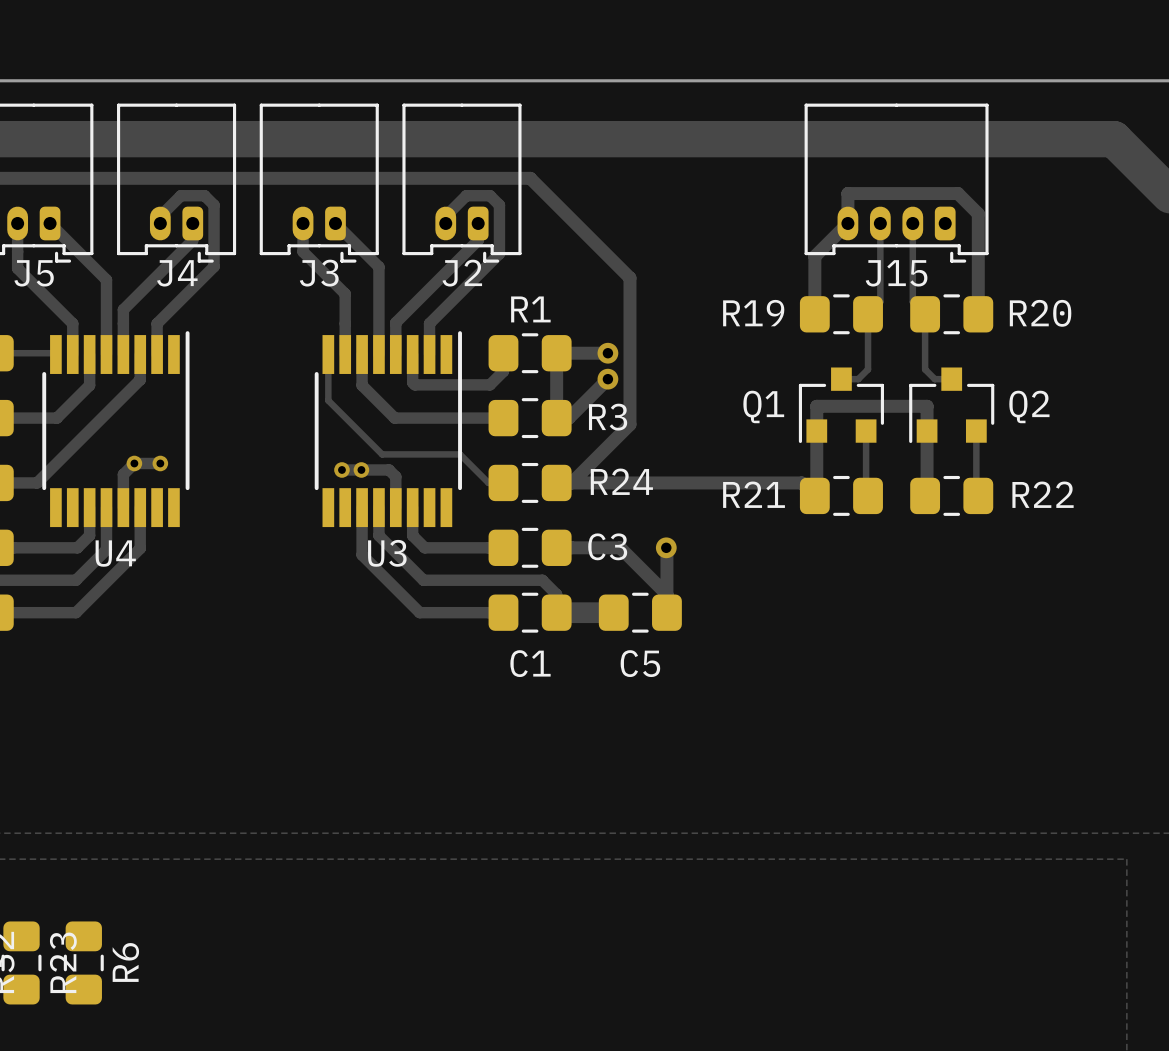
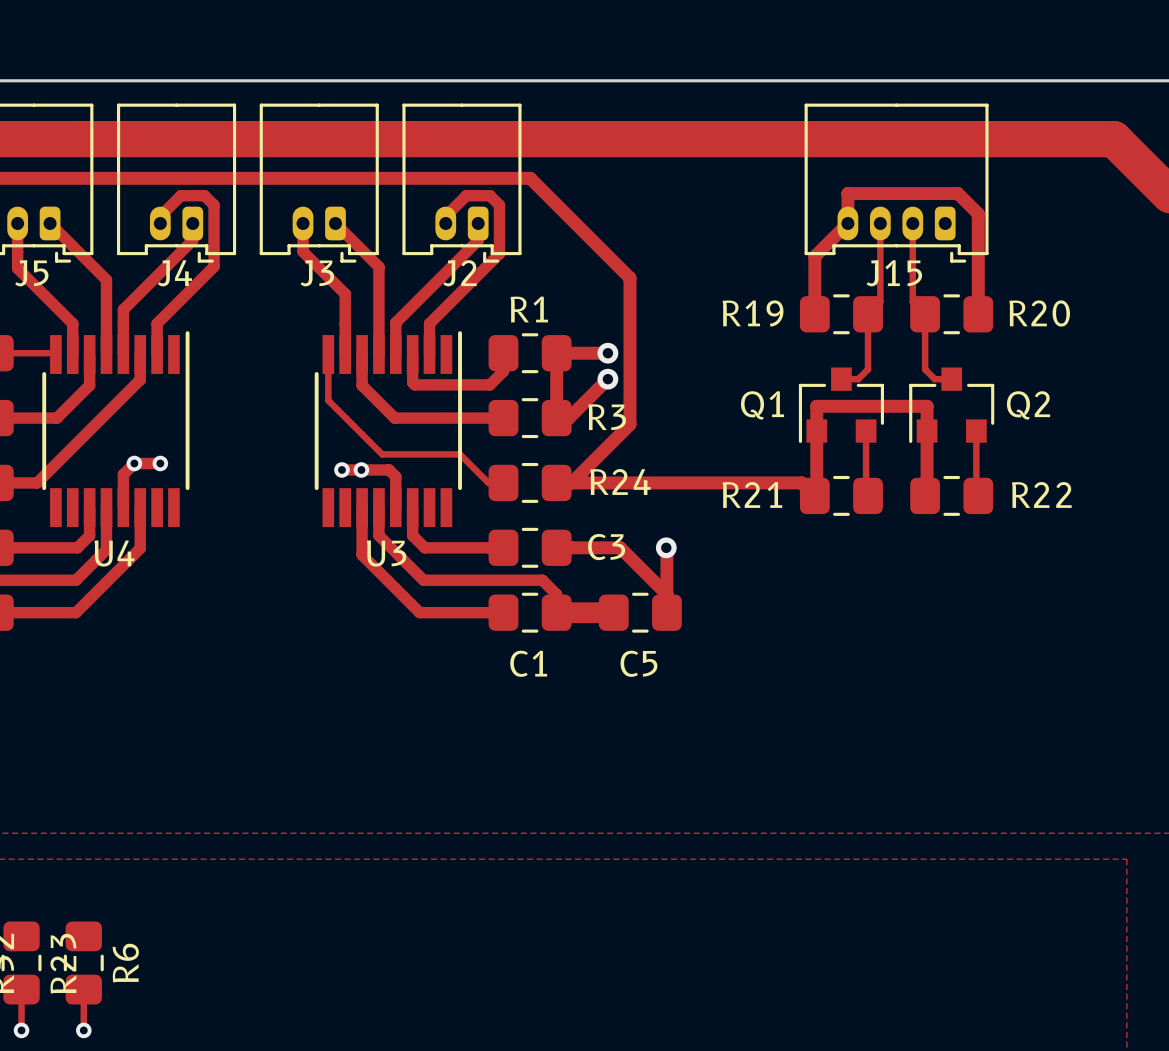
track: none -> (21, 989) (21, 1030)
track: none -> (83, 989) (83, 1030)
via: none -> (21, 1030)
via: none -> (83, 1030)

